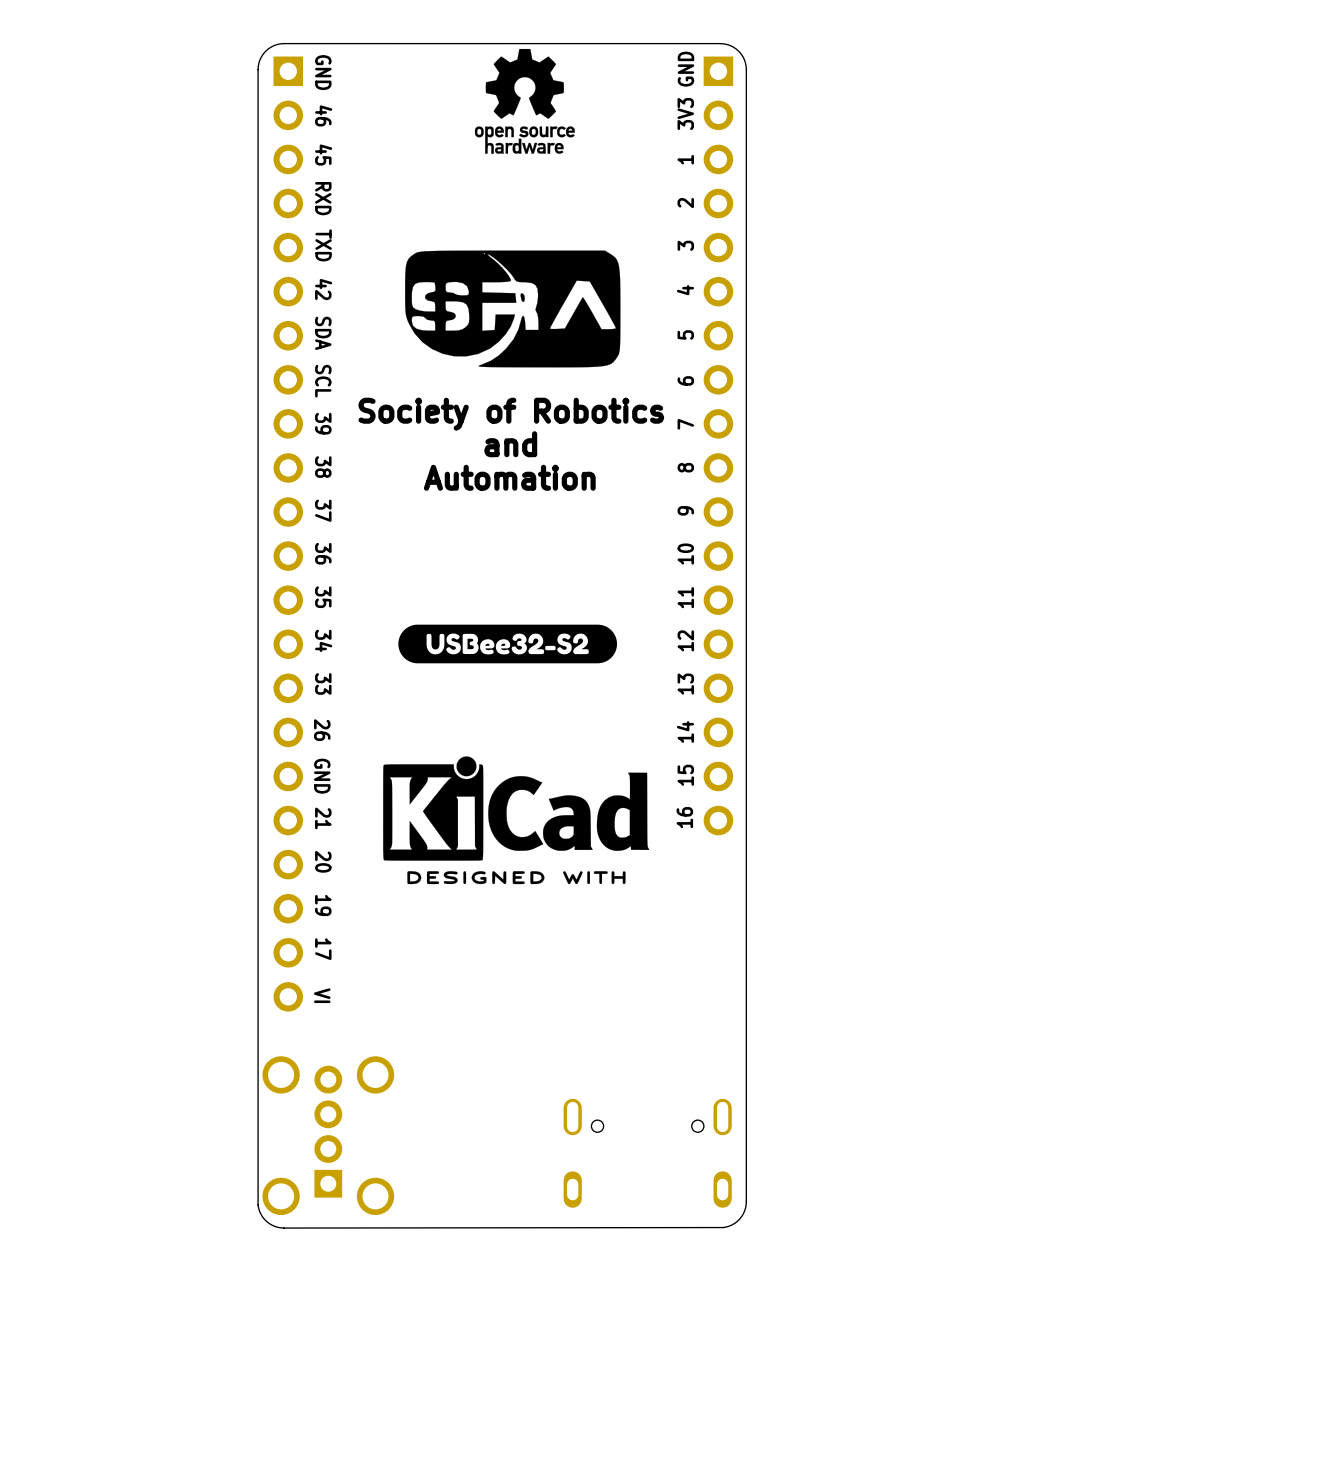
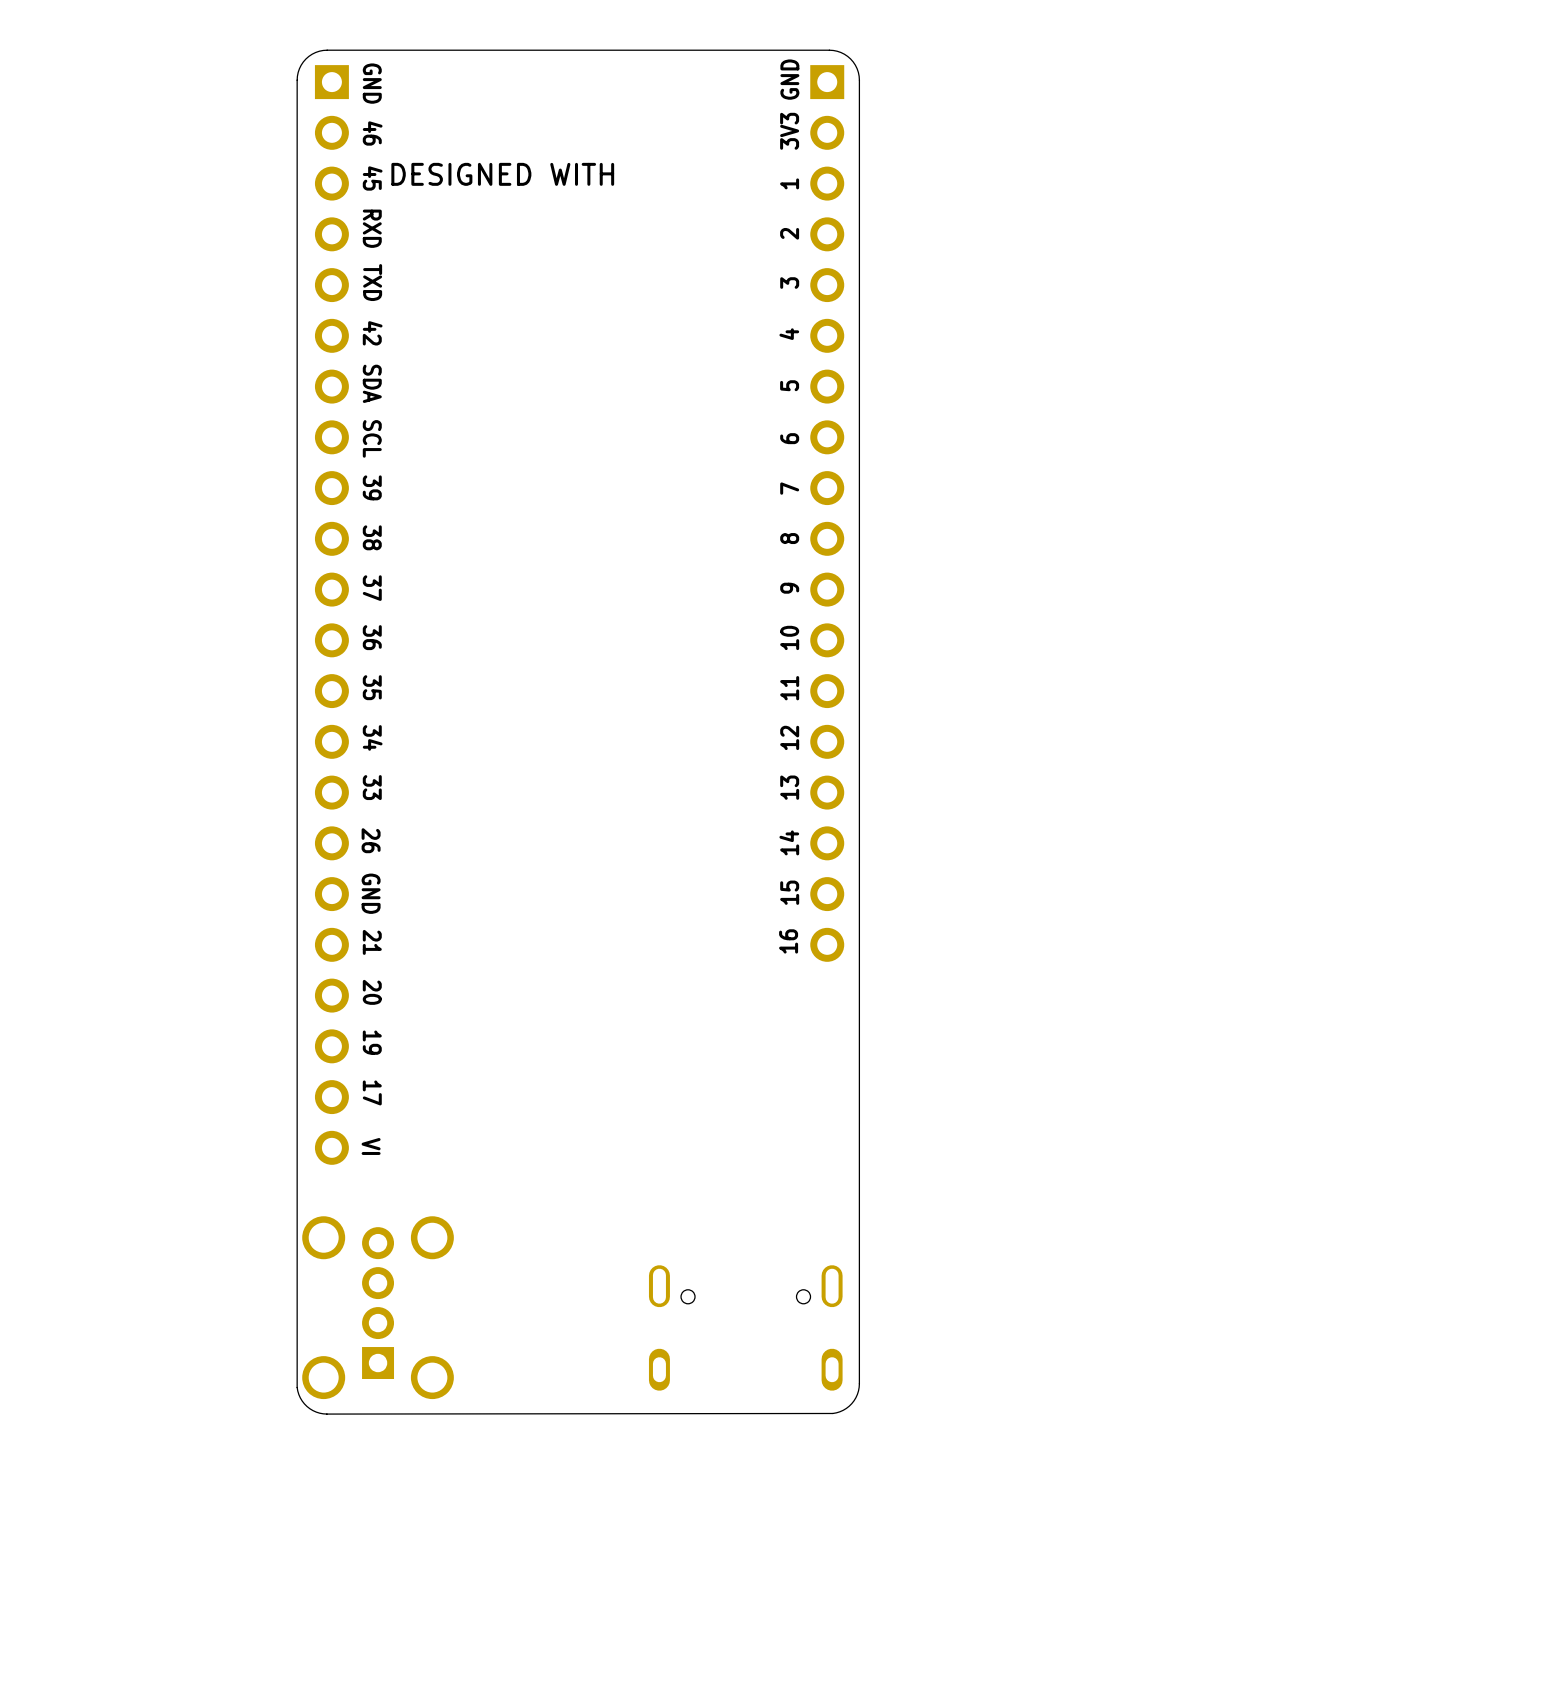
drawing: [474, 48, 575, 154] -> none
text: none -> DESIGNED WITH (502, 174)
drawing: [405, 250, 621, 368] -> none
text: Society of Robotics (511, 414) -> none
text: and (510, 444) -> none
text: Automation (509, 477) -> none
drawing: [398, 624, 618, 664] -> none
drawing: [383, 756, 650, 885] -> none

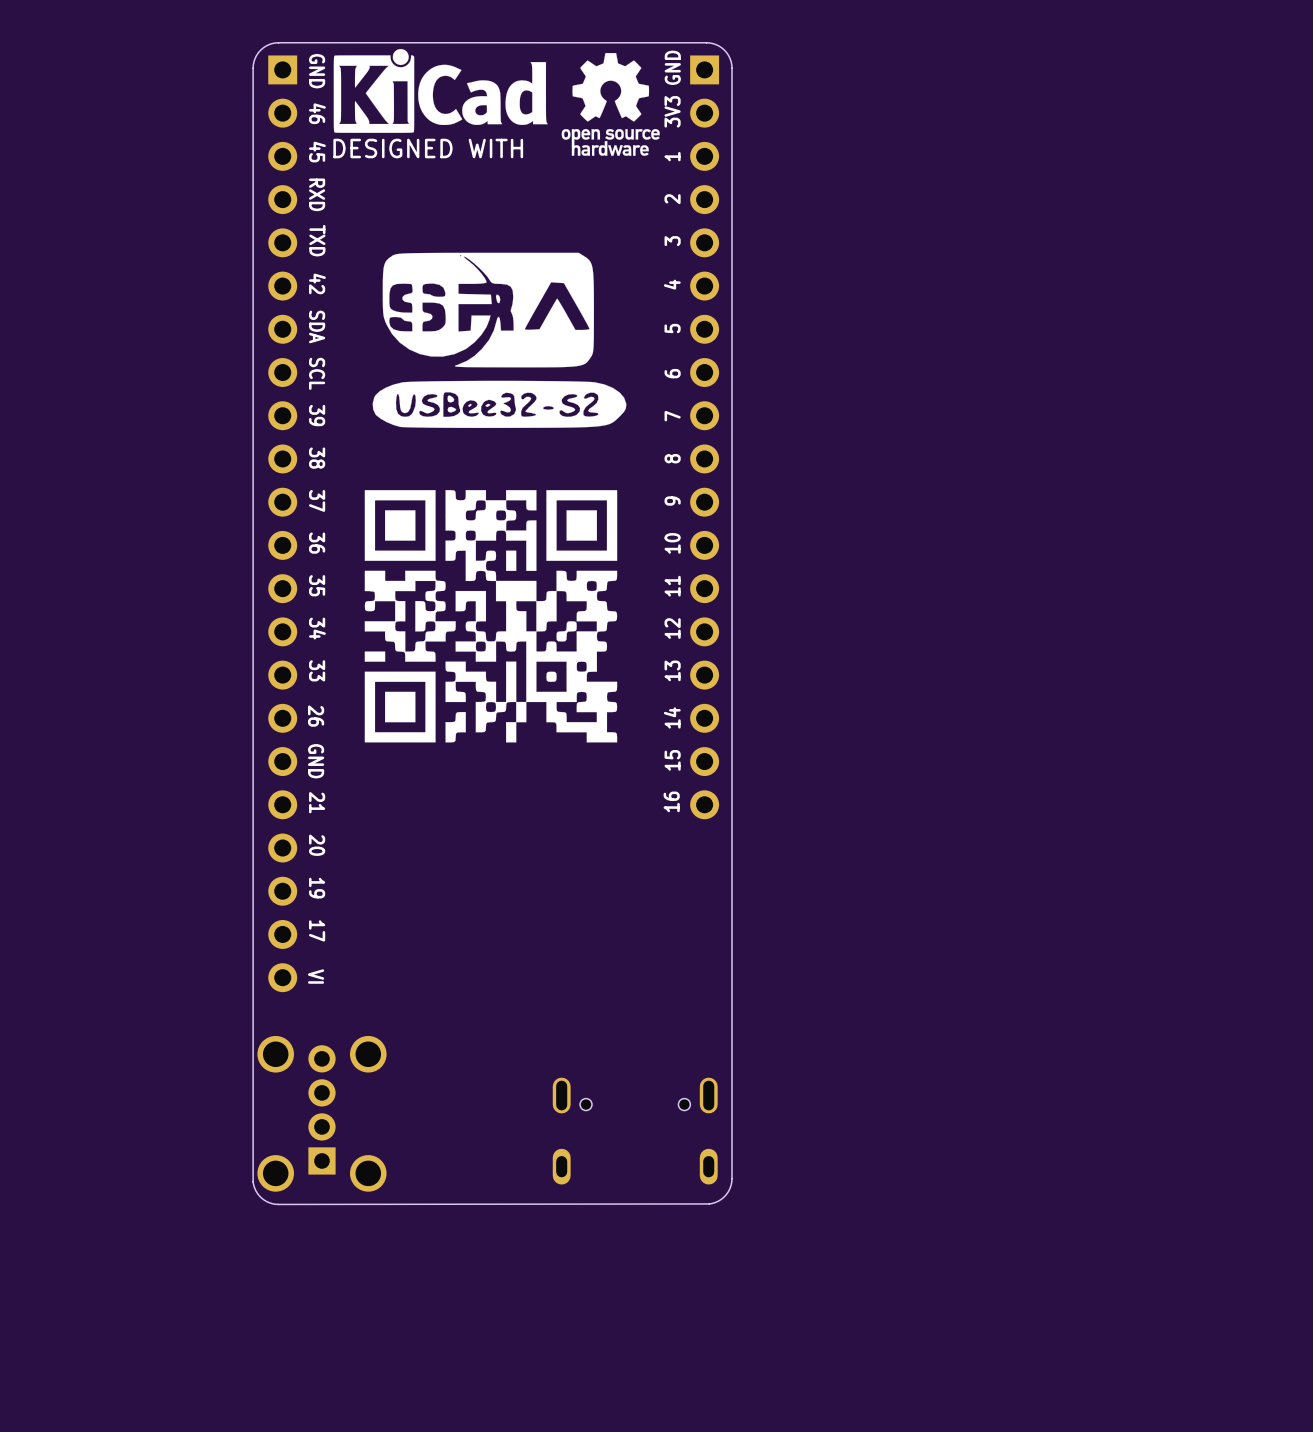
drawing: none -> [333, 49, 660, 156]
drawing: none -> [372, 252, 627, 428]
drawing: none -> [364, 490, 618, 743]

